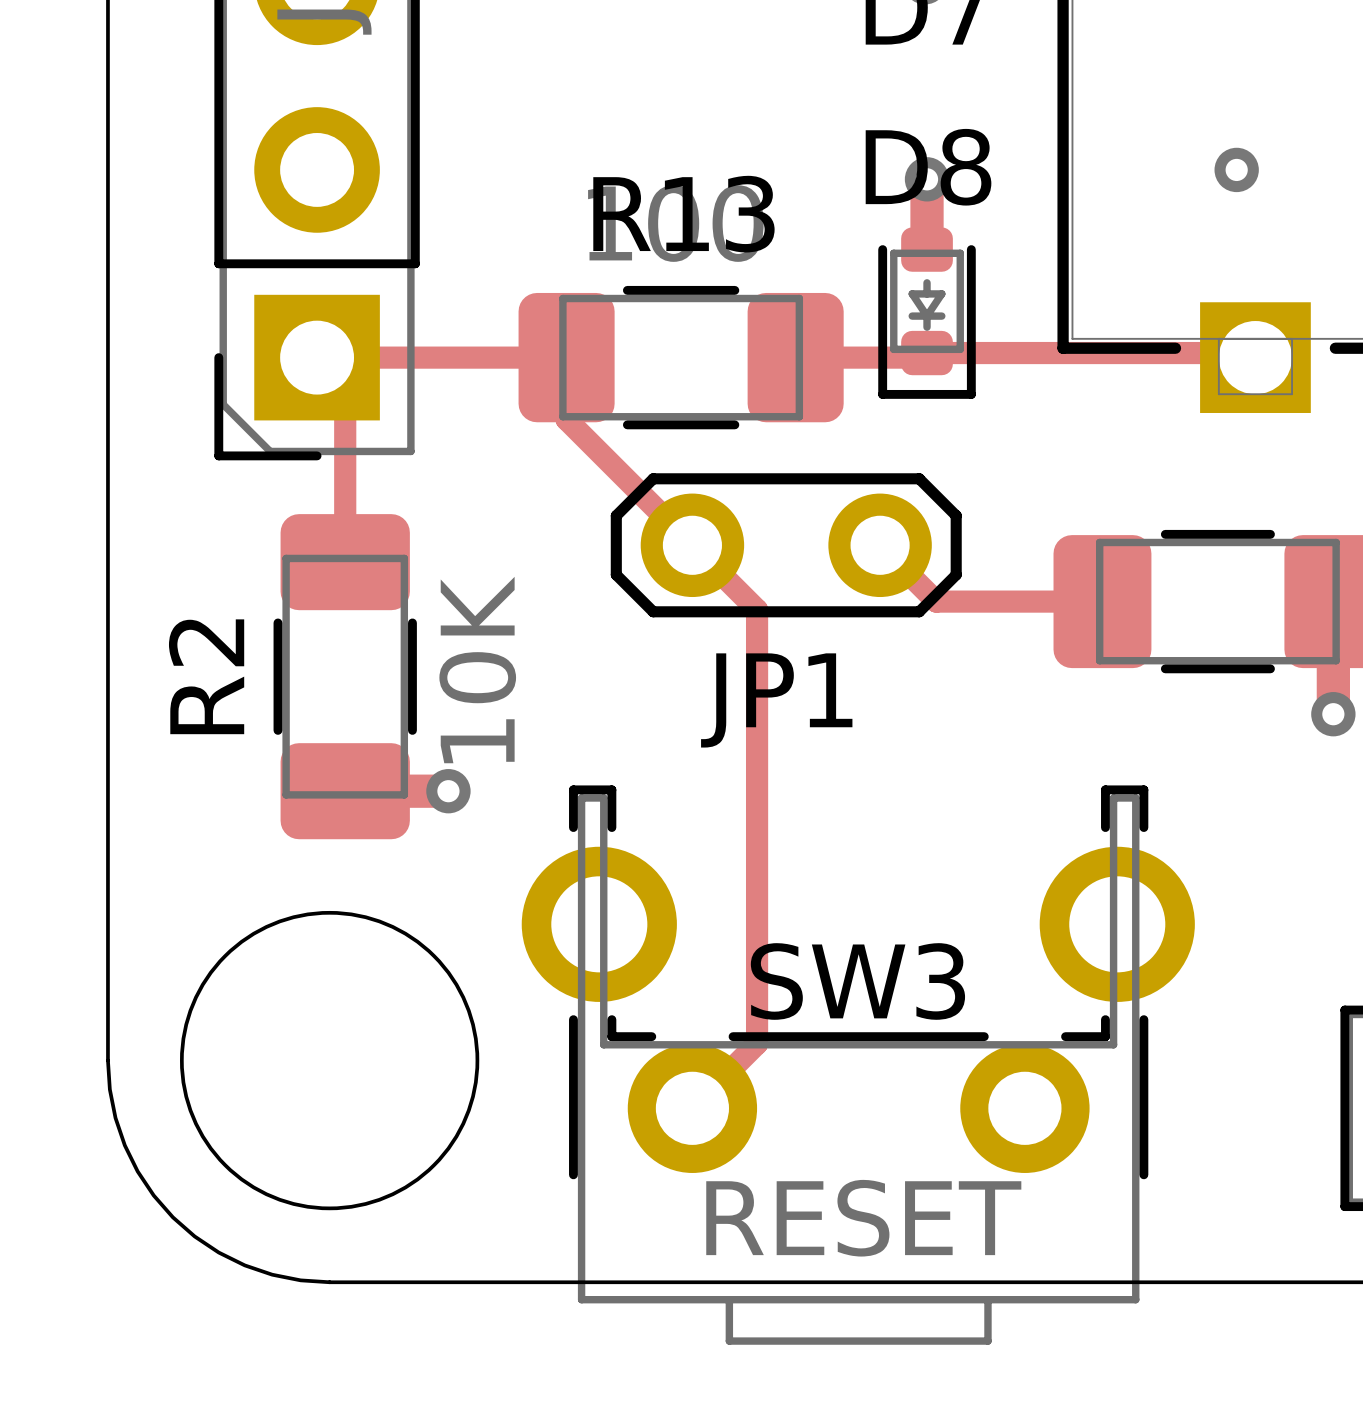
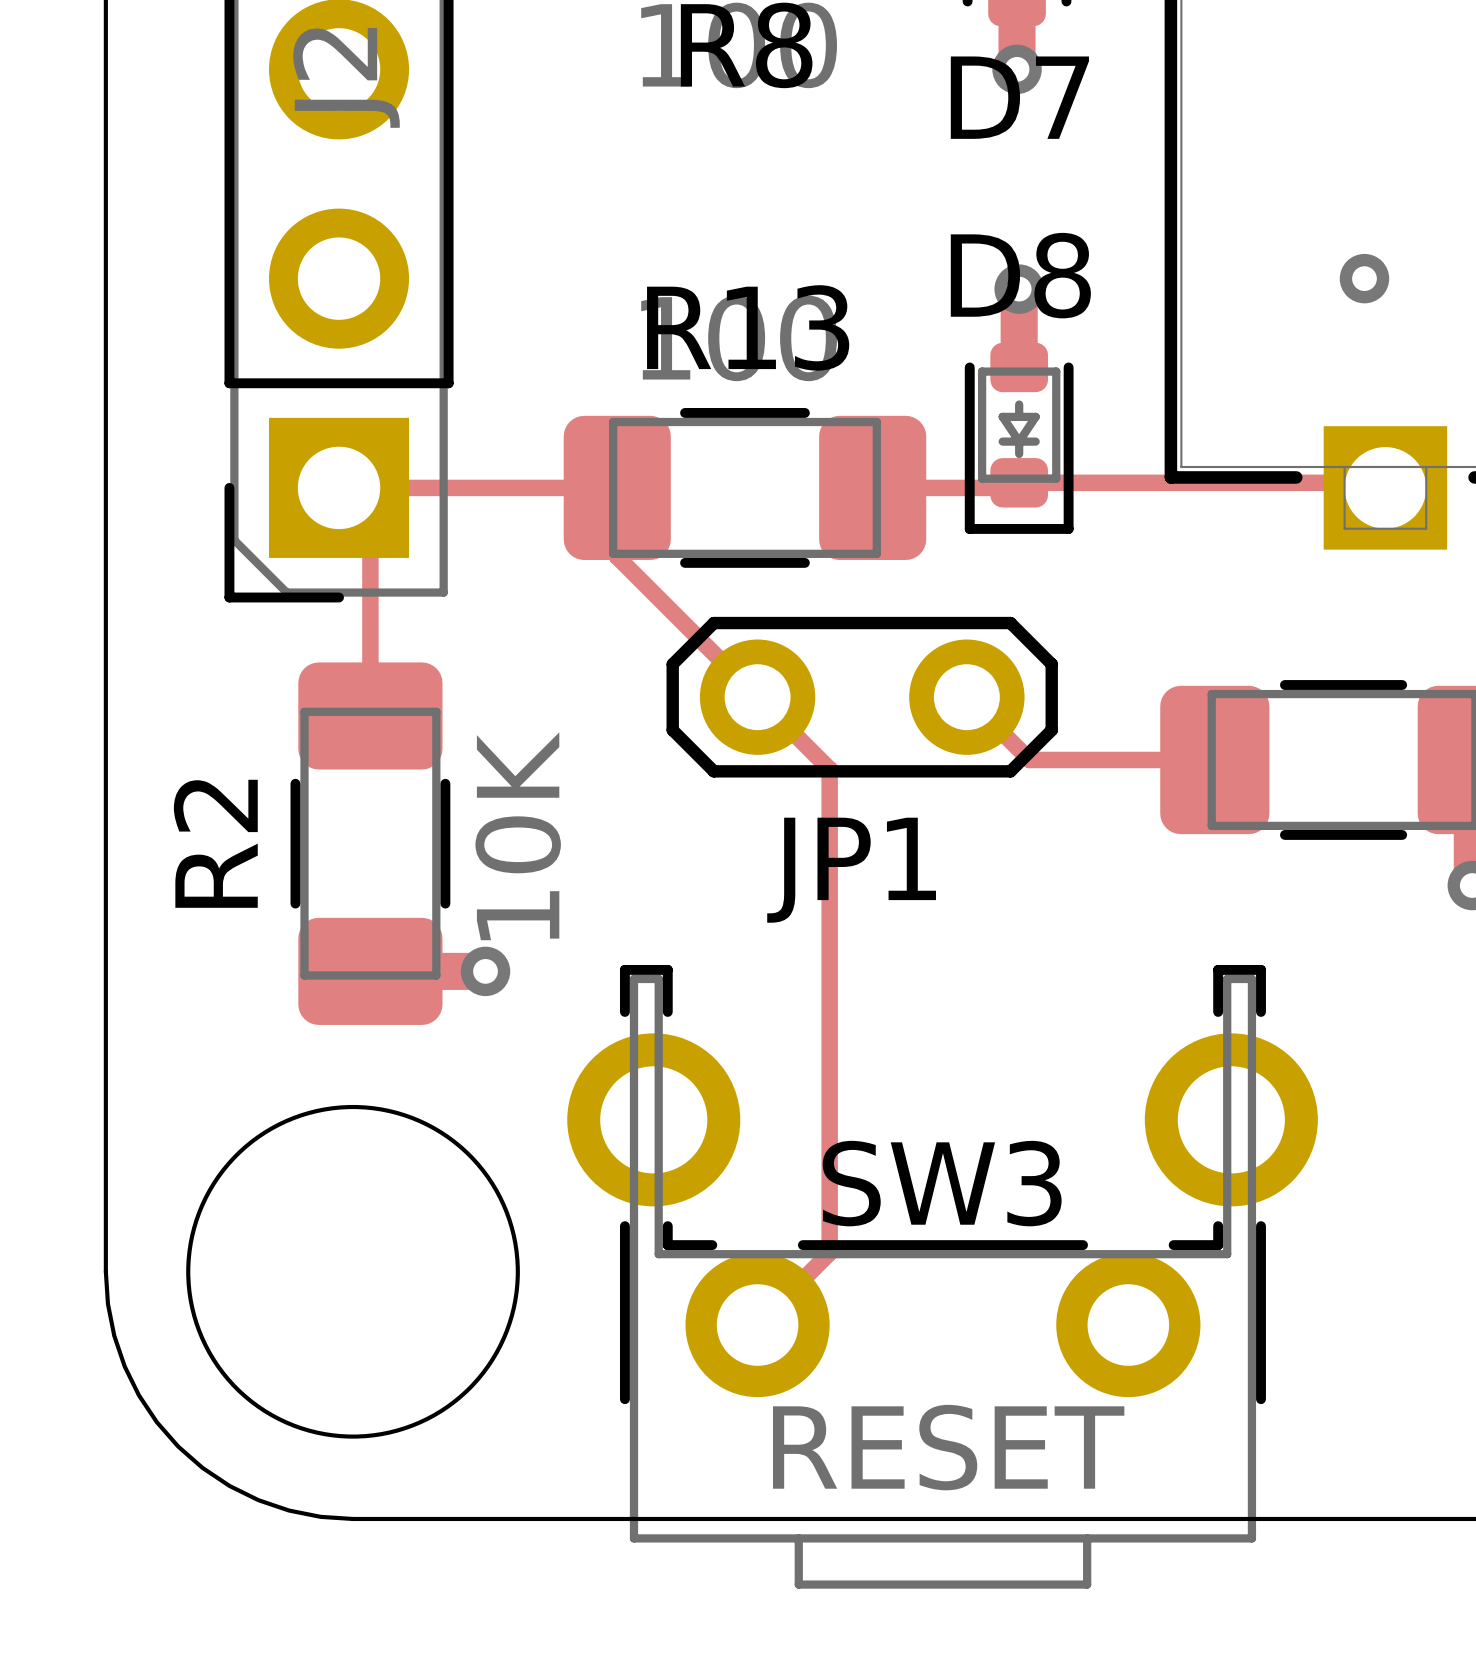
track width: thick (795, 357) (922, 357) (927, 353) (1250, 353) (1255, 357) -> thin (872, 487) (1014, 487) (1019, 482) (1380, 482) (1385, 487)
track width: thick (880, 545) (936, 601) (1102, 601) -> thin (966, 697) (1029, 759) (1214, 759)
track width: thick (345, 562) (345, 385) (317, 357) (566, 357) (566, 419) (757, 609) (757, 1043) (692, 1108) -> thin (370, 715) (370, 519) (339, 487) (617, 487) (617, 556) (829, 769) (829, 1252) (757, 1325)

